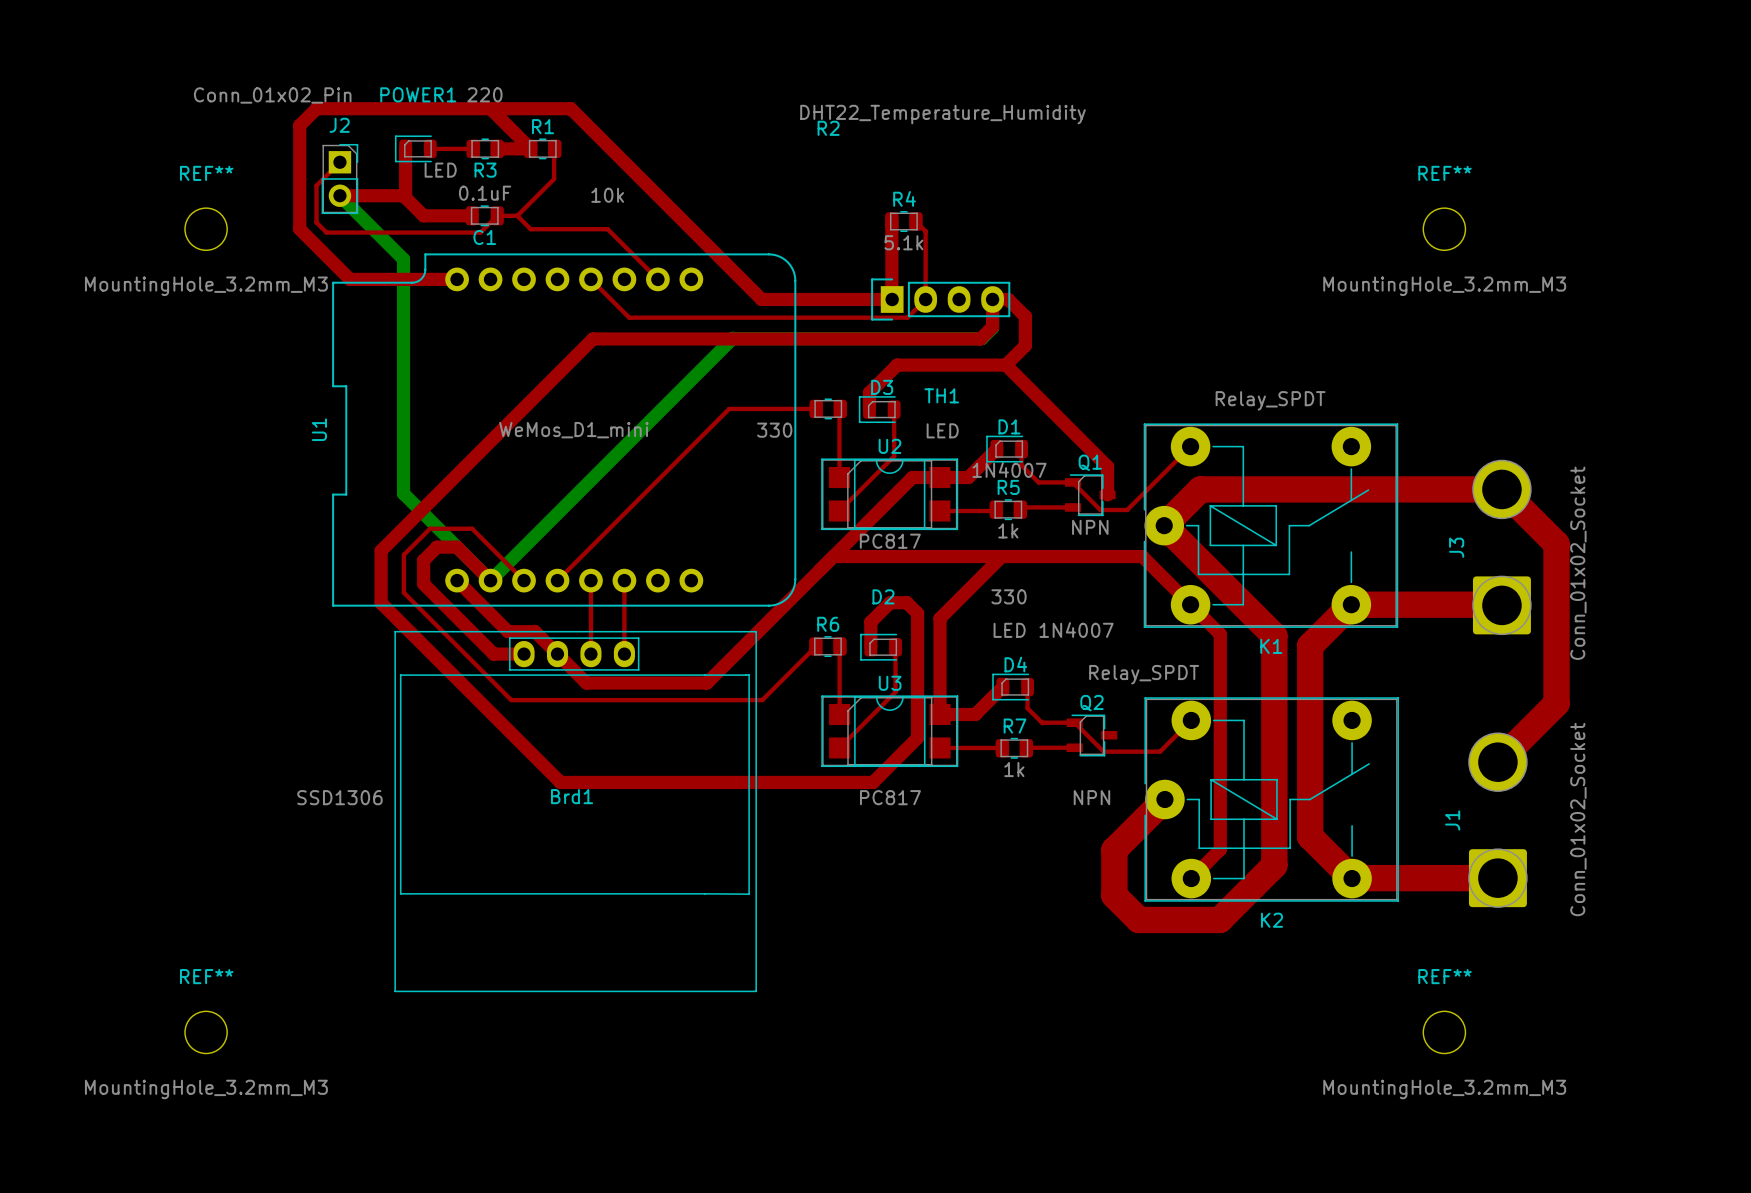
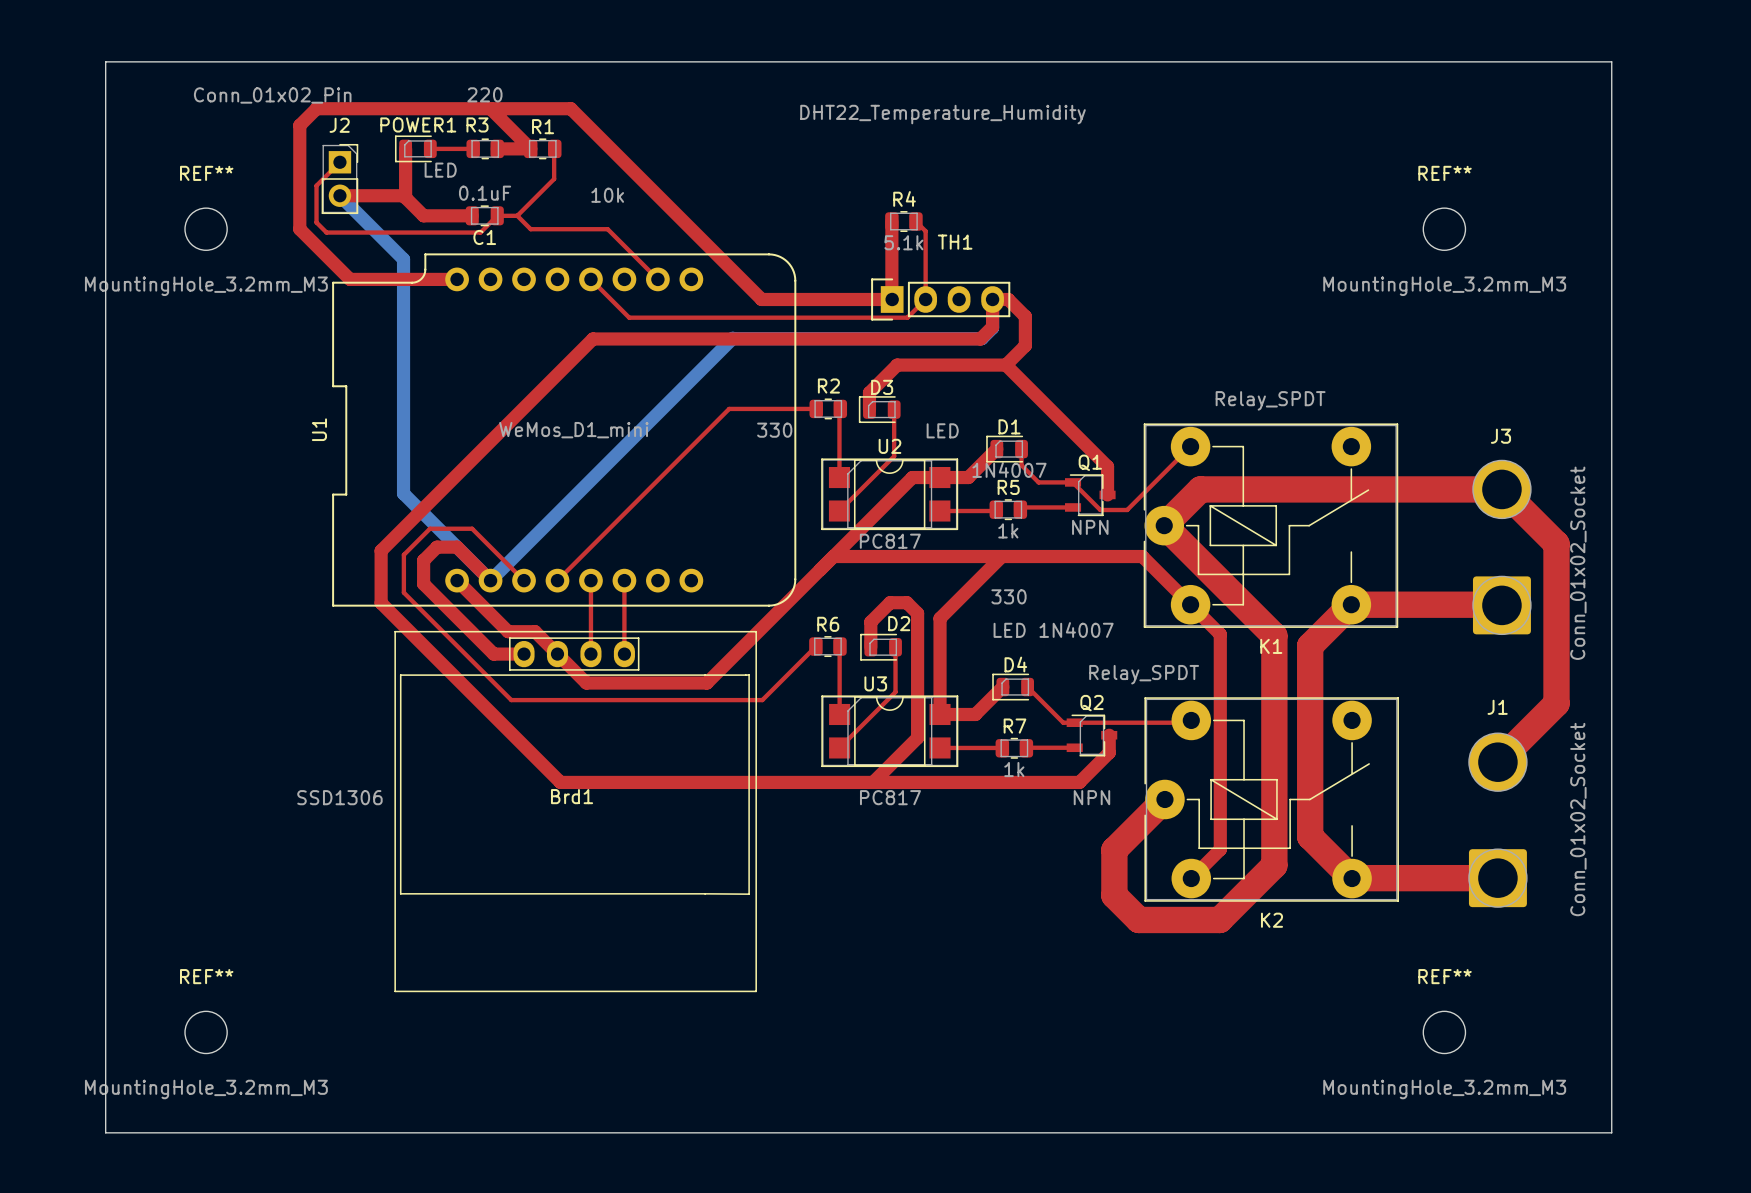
board edge: none -> (105, 61) (1611, 61) (1611, 1132) (105, 1132) (105, 61)
POWER1 name position: POWER1 (418, 94) -> POWER1 (418, 124)
R2 name position: R2 (828, 128) -> R2 (828, 386)
R3 name position: R3 (485, 170) -> R3 (477, 124)
TH1 name position: TH1 (941, 395) -> TH1 (955, 242)
J3 name rotation: 0° (1456, 547) -> 90° clockwise (1500, 436)
J3 name position: J3 (1456, 547) -> J3 (1500, 436)
D2 name position: D2 (883, 596) -> D2 (899, 623)
U3 name position: U3 (890, 683) -> U3 (875, 683)
top track: (1027, 687) (1027, 708) (1042, 723) (1063, 722) -> (1027, 687) (1063, 722)
top track: (1074, 722) (1103, 751) (1160, 751) (1189, 722) -> (1074, 722) (1189, 722)
top track: none -> (1109, 735) (1109, 752) (1079, 782) (873, 782)
J1 name rotation: 0° (1452, 820) -> 90° clockwise (1497, 707)
J1 name position: J1 (1452, 820) -> J1 (1497, 707)

